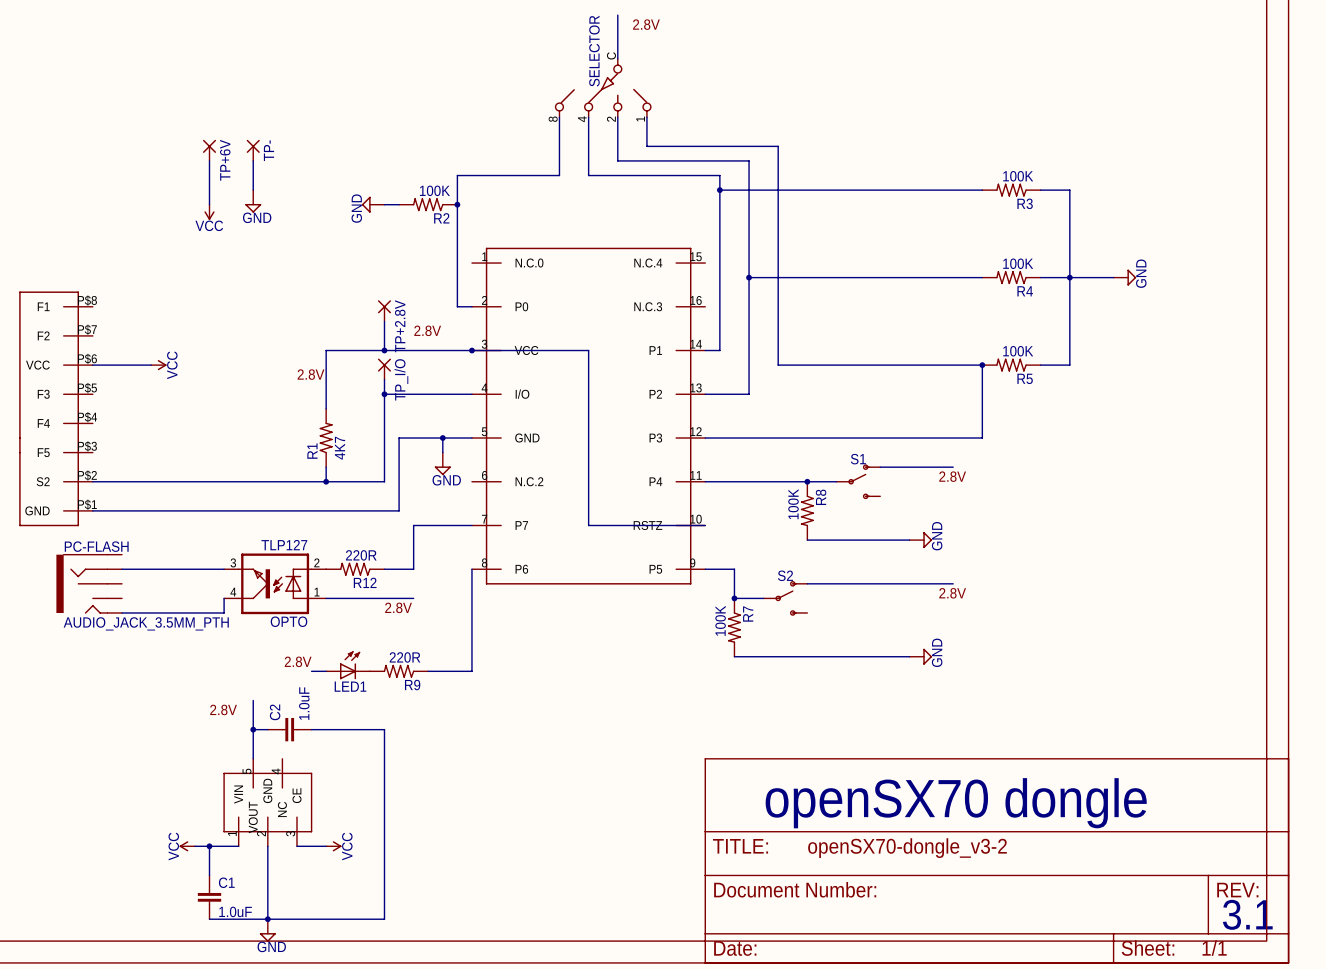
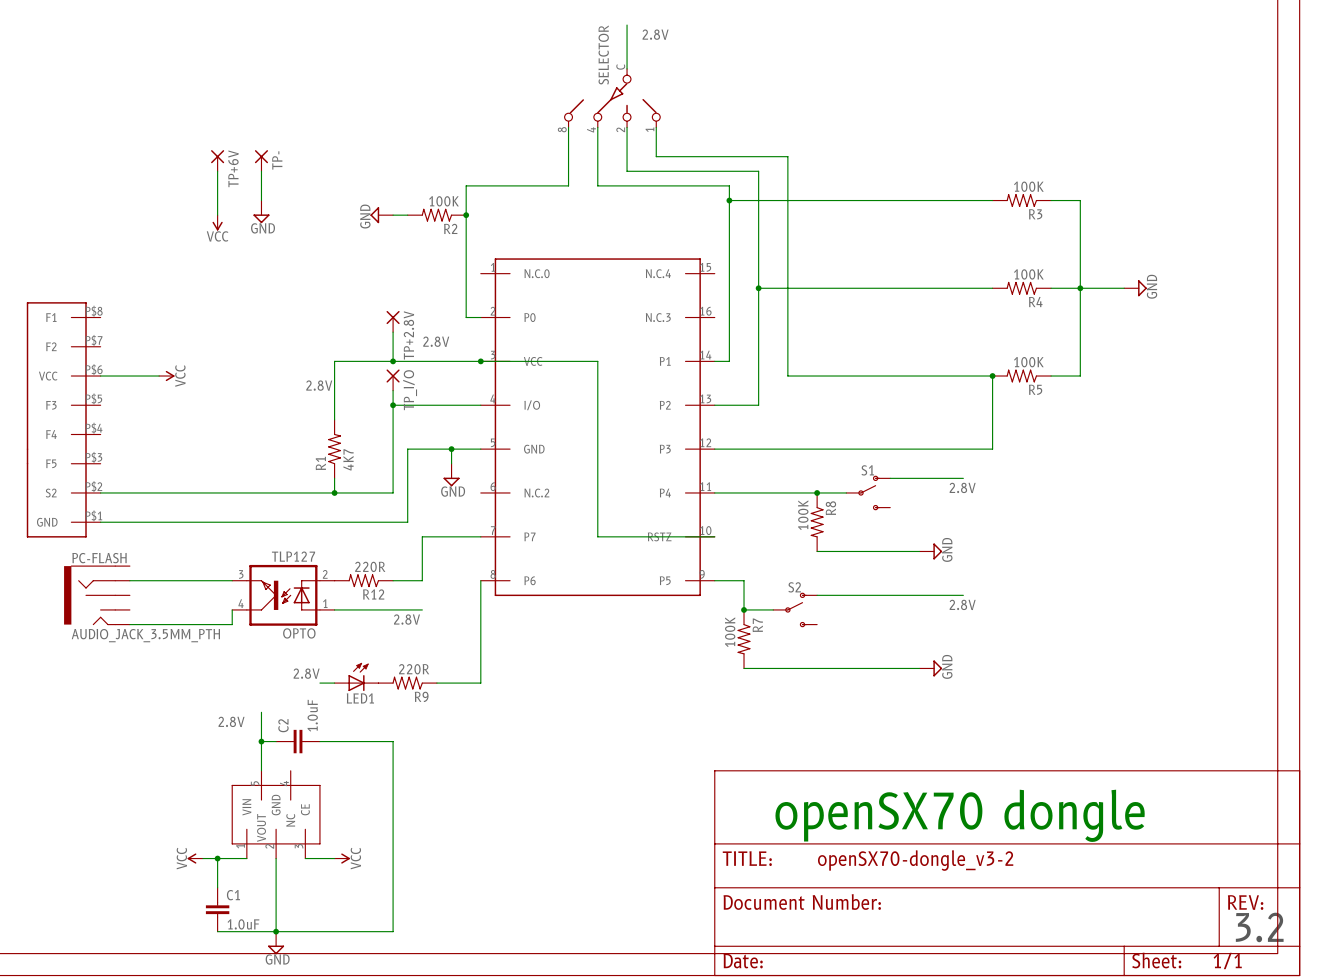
text: 3.1 (1247, 914) -> 3.2 (1259, 927)

